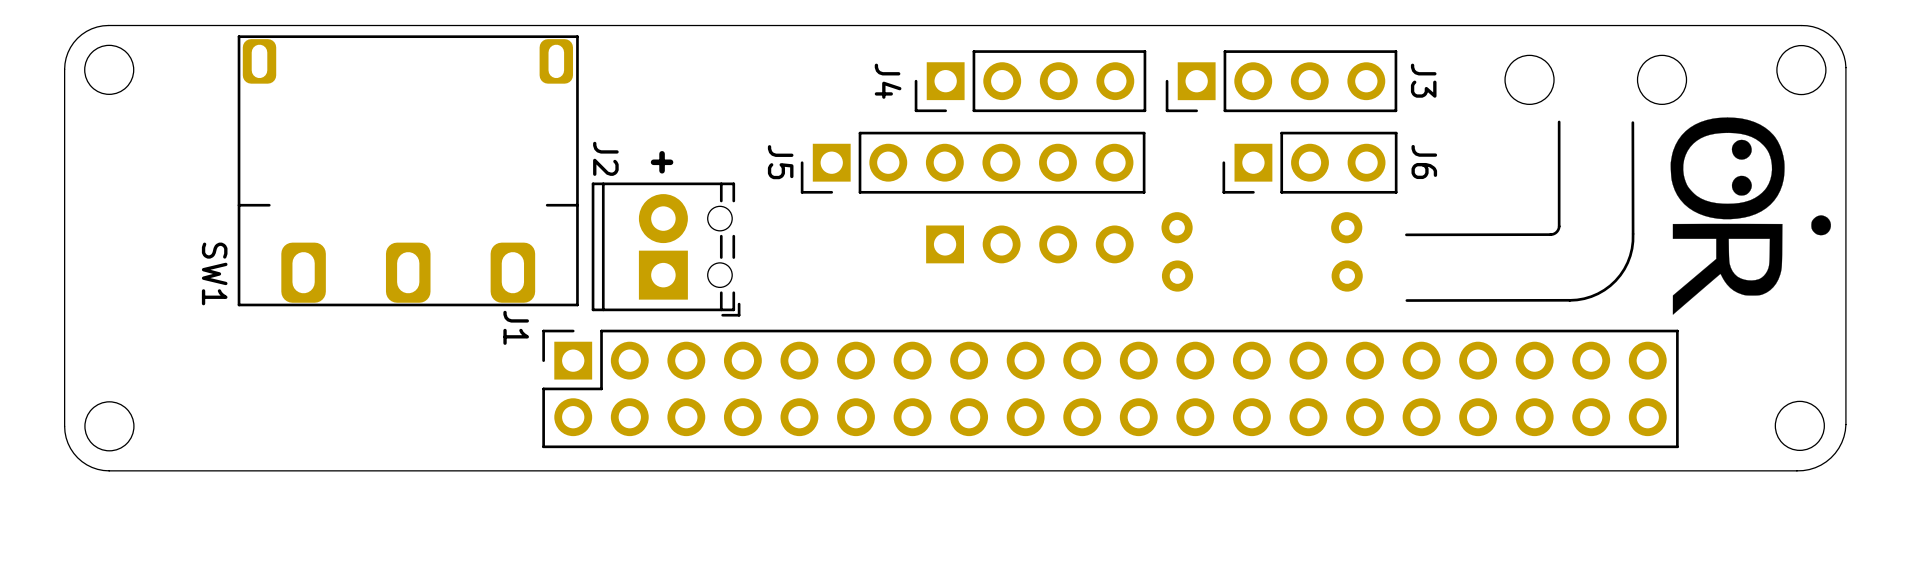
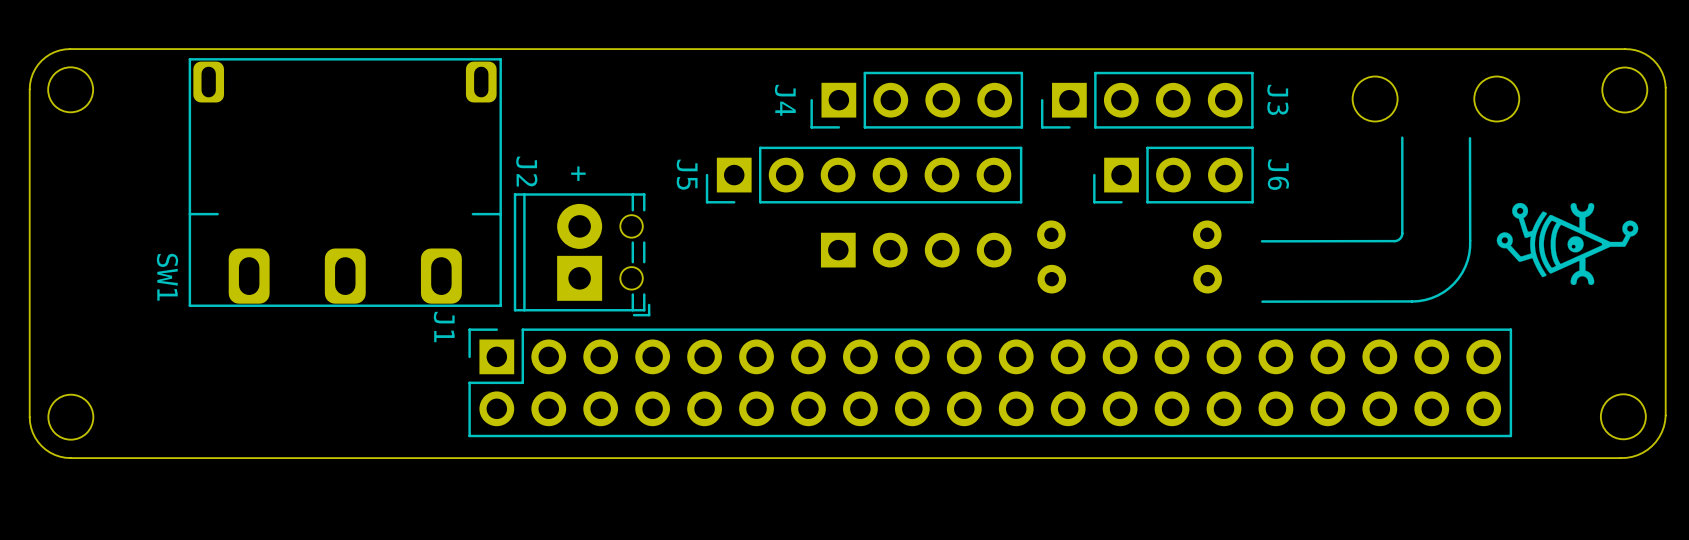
drawing: [1670, 117, 1831, 315] -> none
drawing: none -> [1496, 202, 1639, 286]

